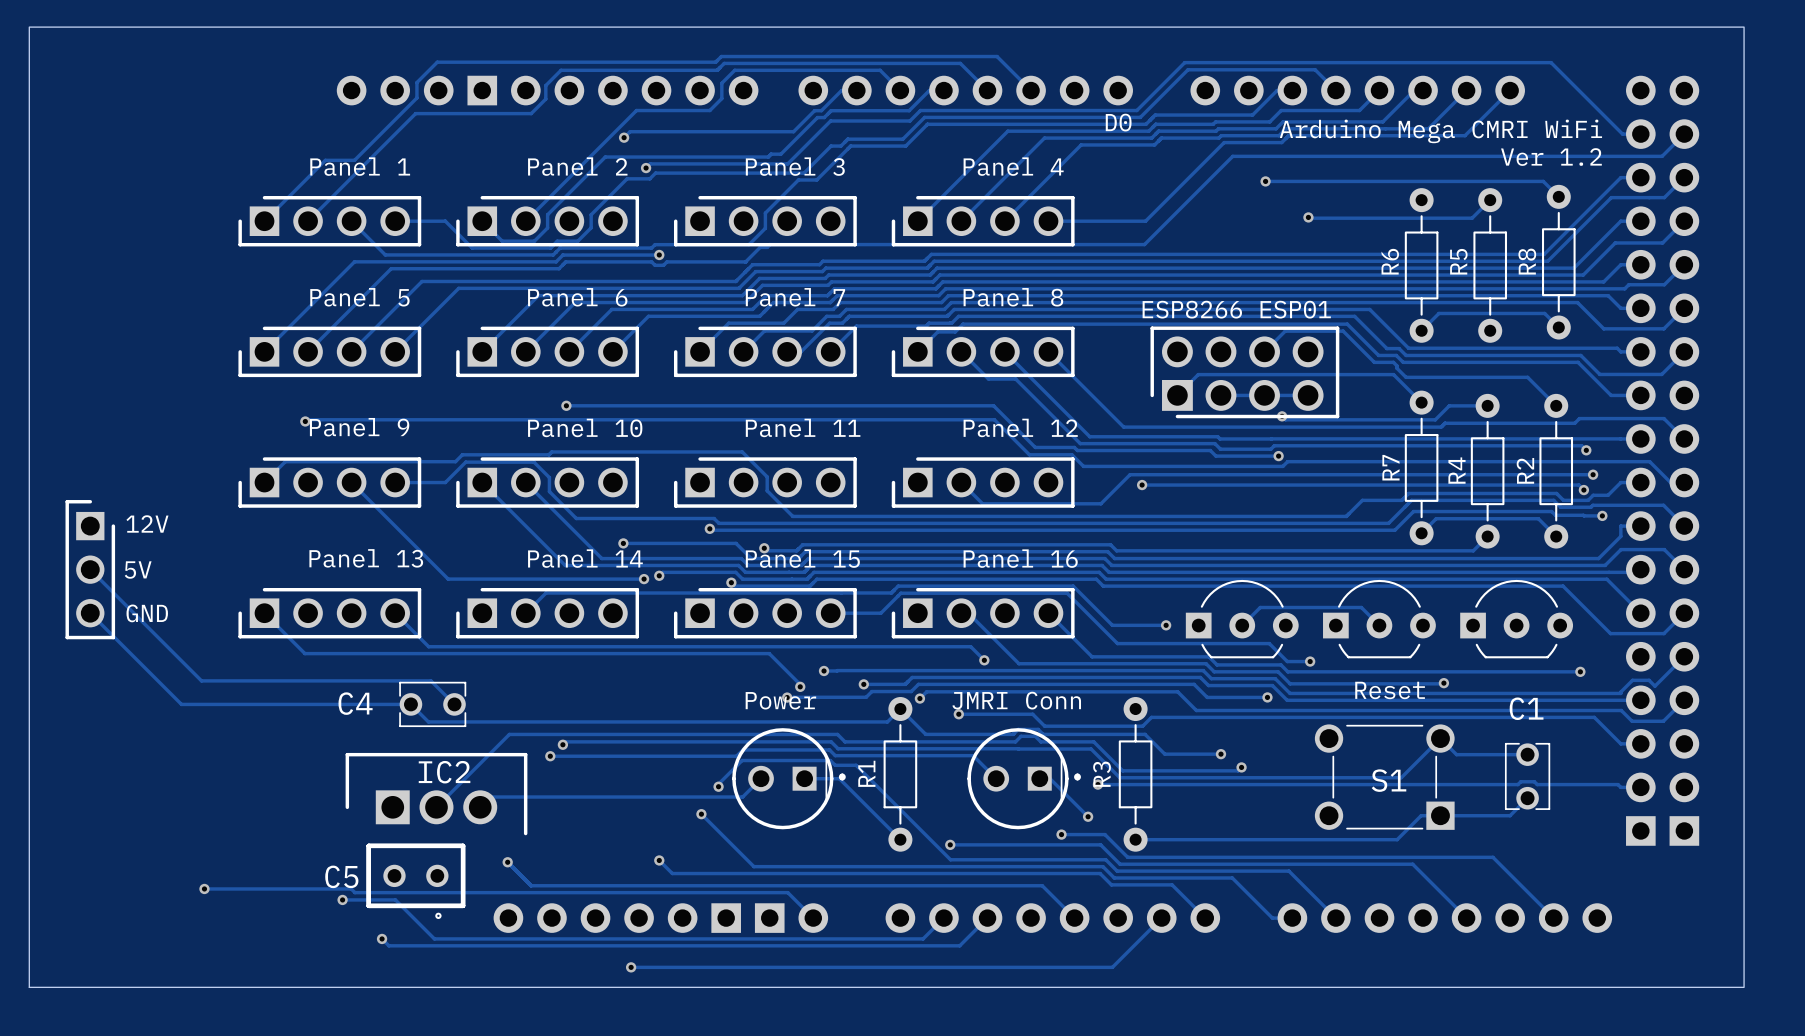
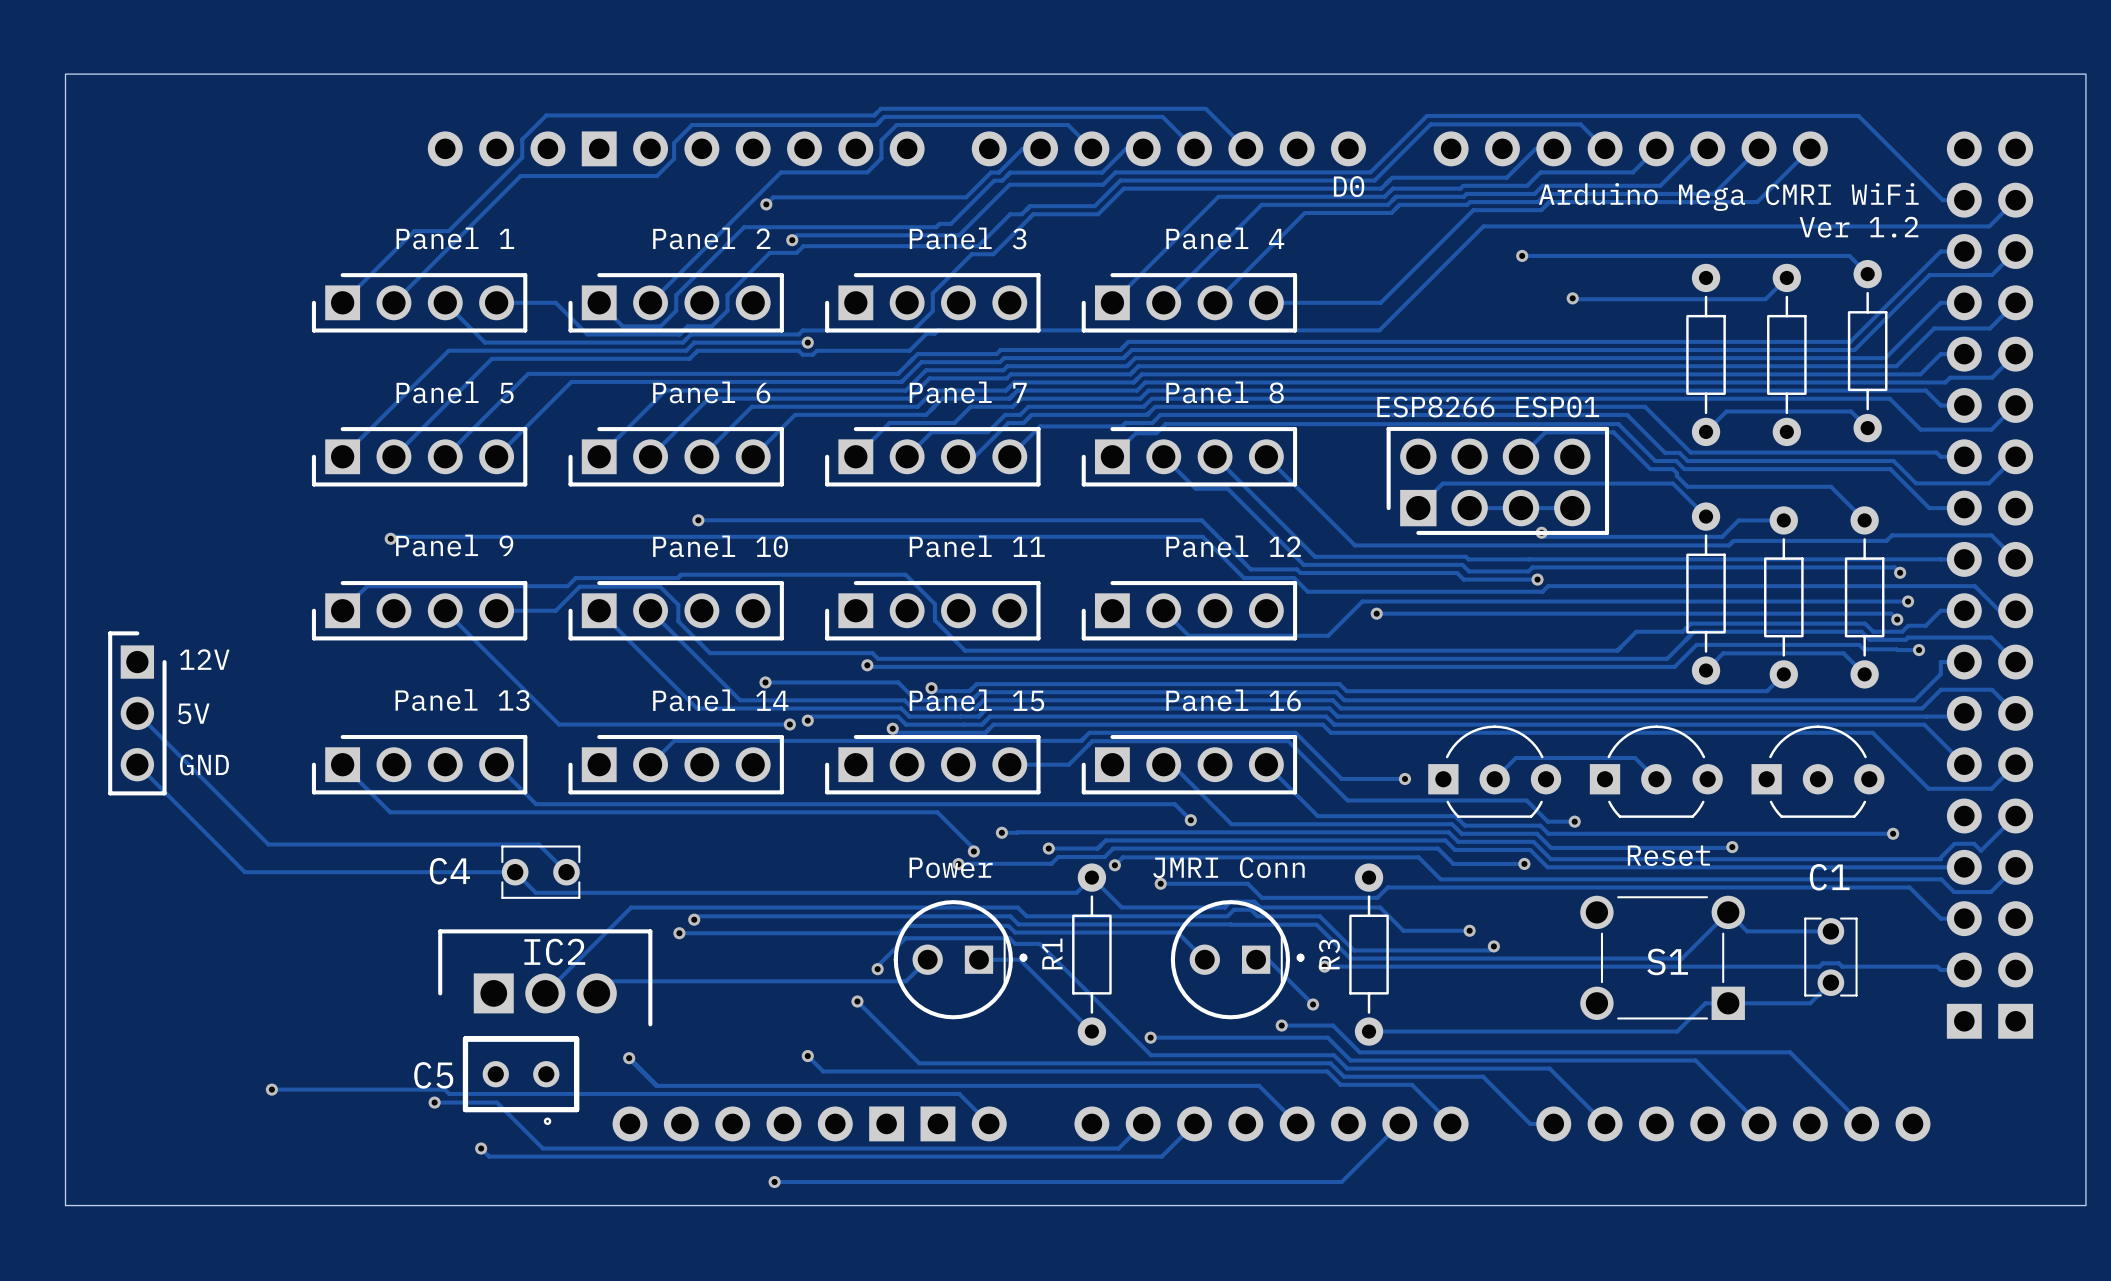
R6 name: R6 (1390, 261) -> none
R5 name: R5 (1458, 261) -> none
R8 name: R8 (1527, 261) -> none
R7 name: R7 (1390, 467) -> none
R4 name: R4 (1456, 470) -> none
R2 name: R2 (1525, 470) -> none

